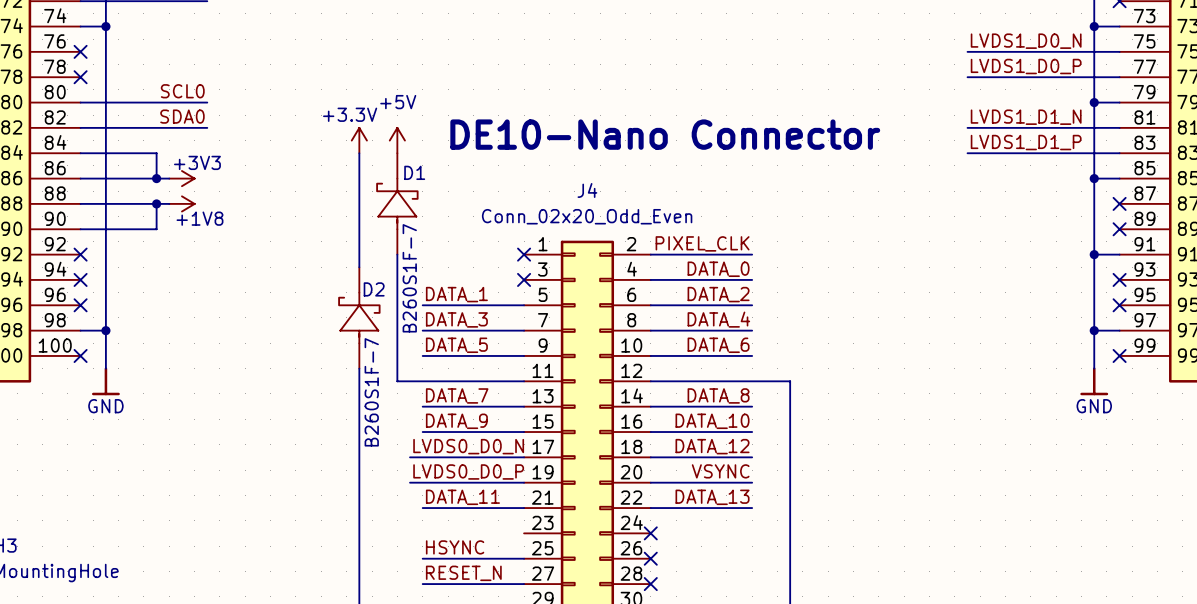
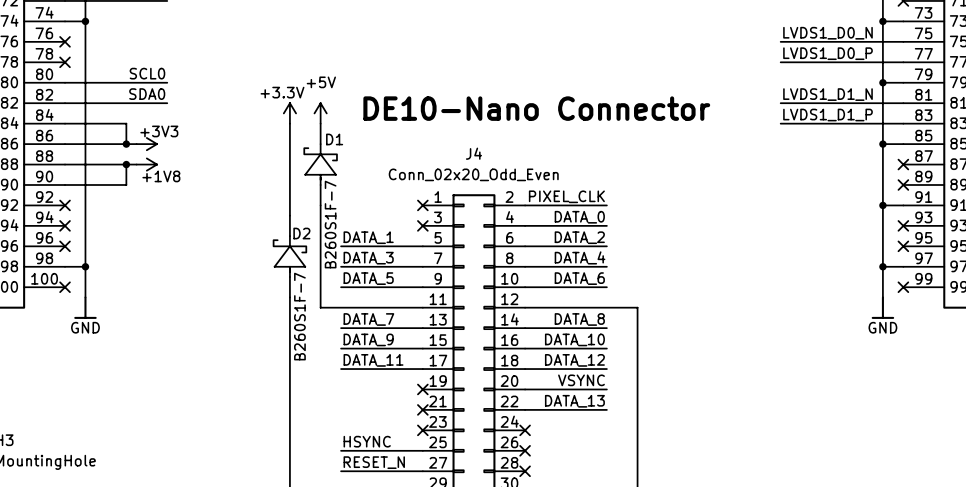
label: LVDS0_D0_N (468, 446) -> none
wire: (410, 457) (422, 457) -> none
label: LVDS0_D0_P (468, 471) -> none
wire: (410, 482) (524, 482) -> none
no-connect mark: none -> (422, 389)
label position: DATA_11 (462, 497) -> DATA_11 (373, 360)
wire: (422, 508) (524, 508) -> none
no-connect mark: none -> (422, 409)
no-connect mark: none -> (422, 430)

